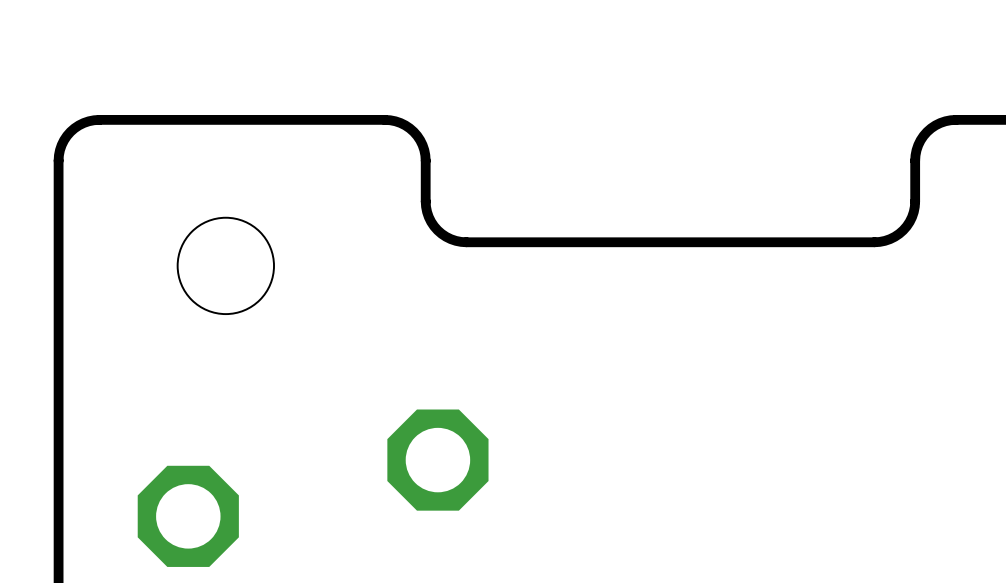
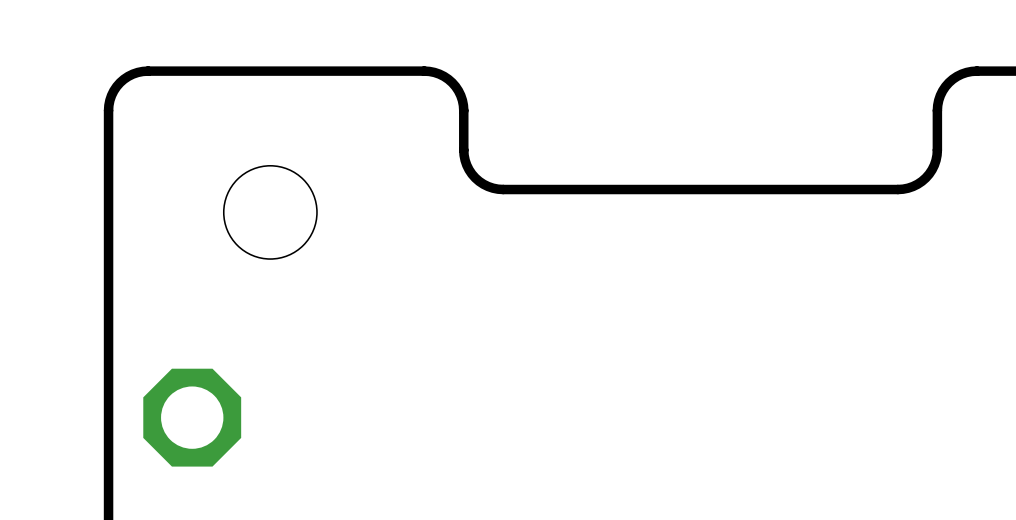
part: (437, 460) -> none
part position: (188, 516) -> (192, 417)

